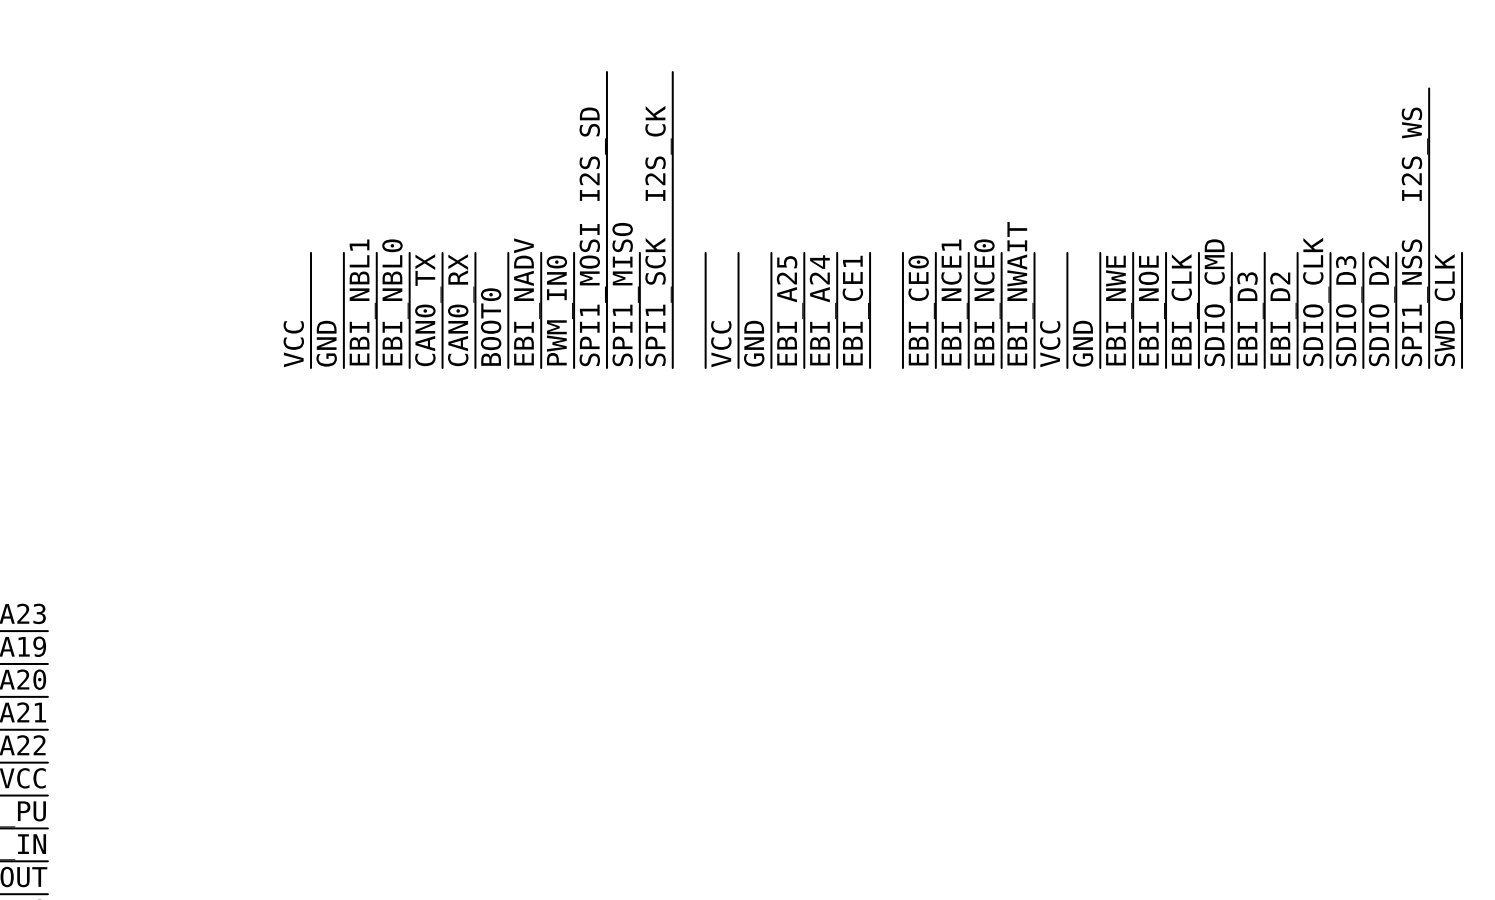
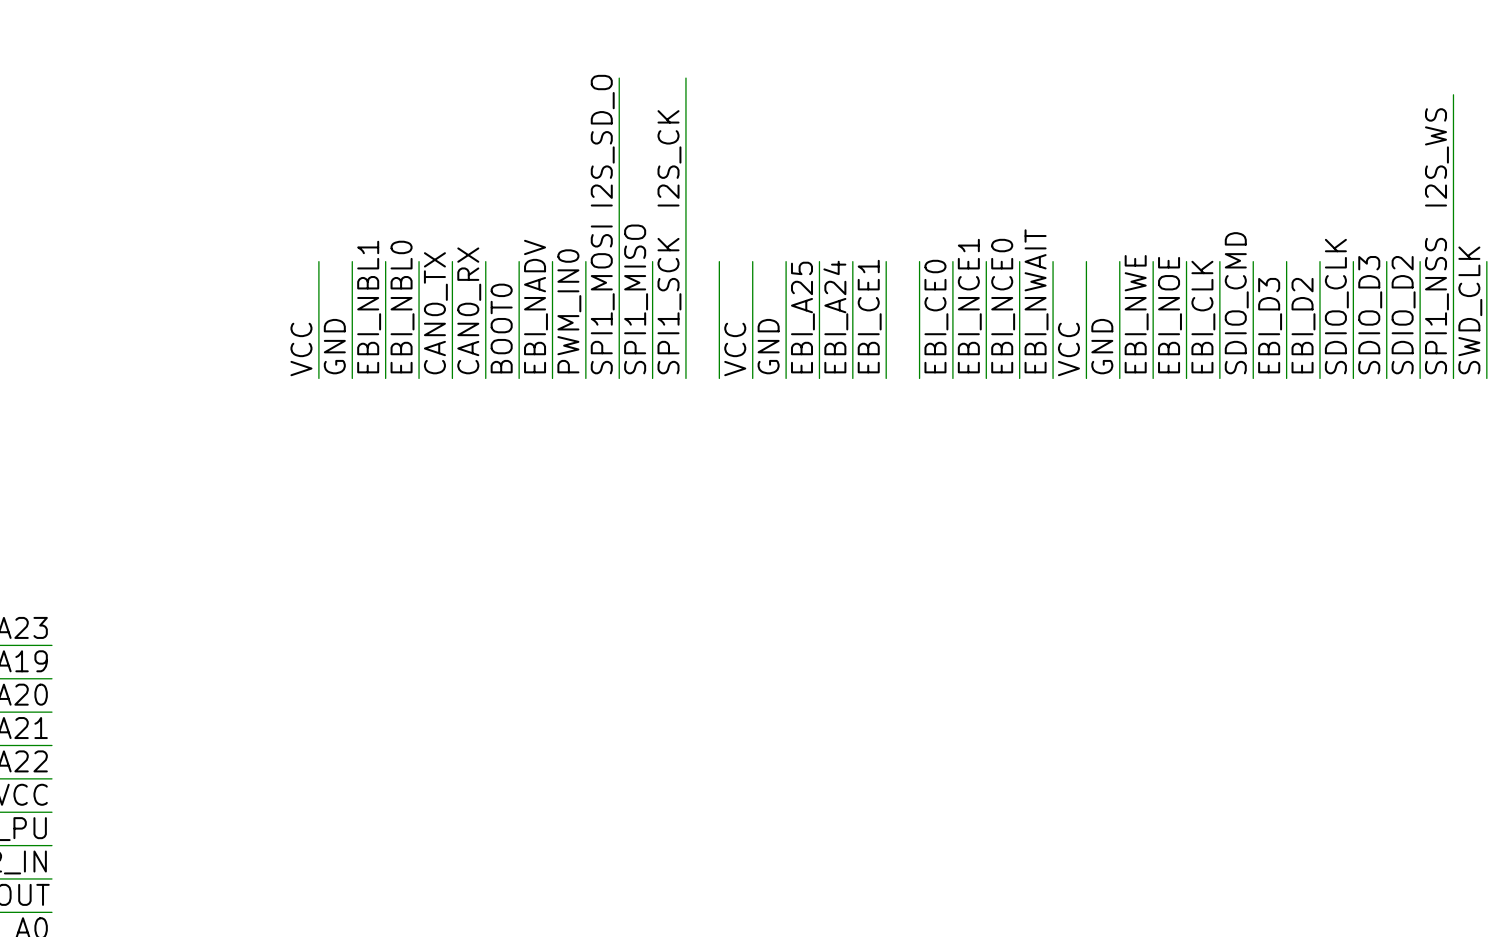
label: I2S_SD (592, 154) -> I2S_SD_O (602, 140)

